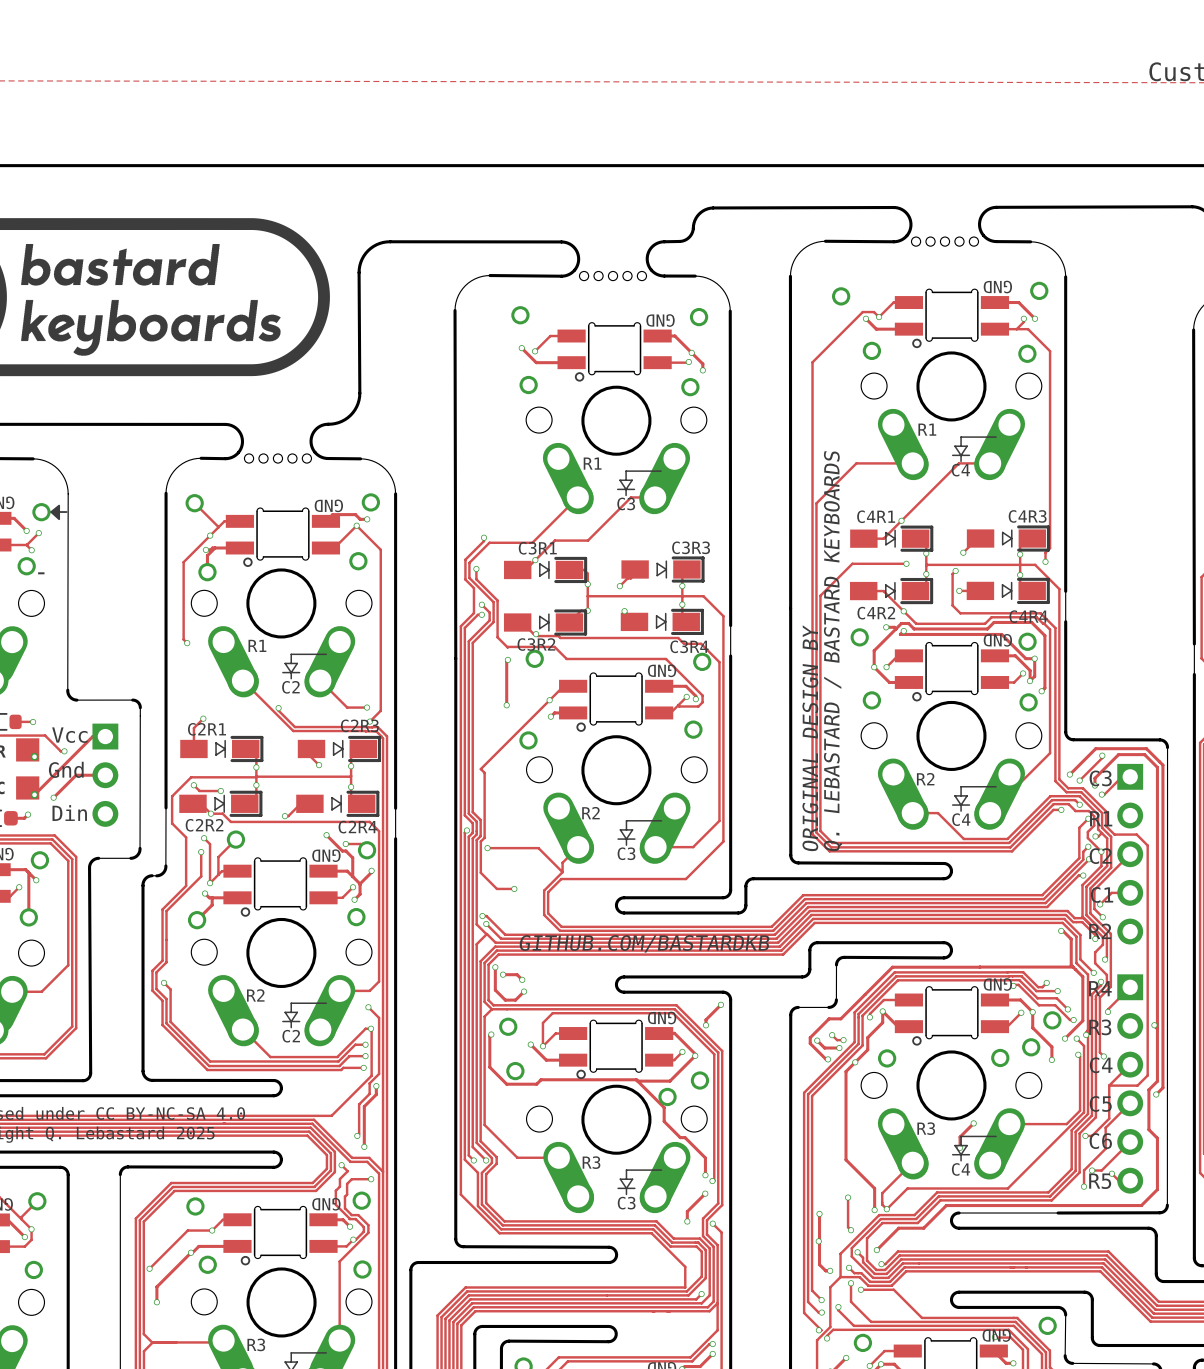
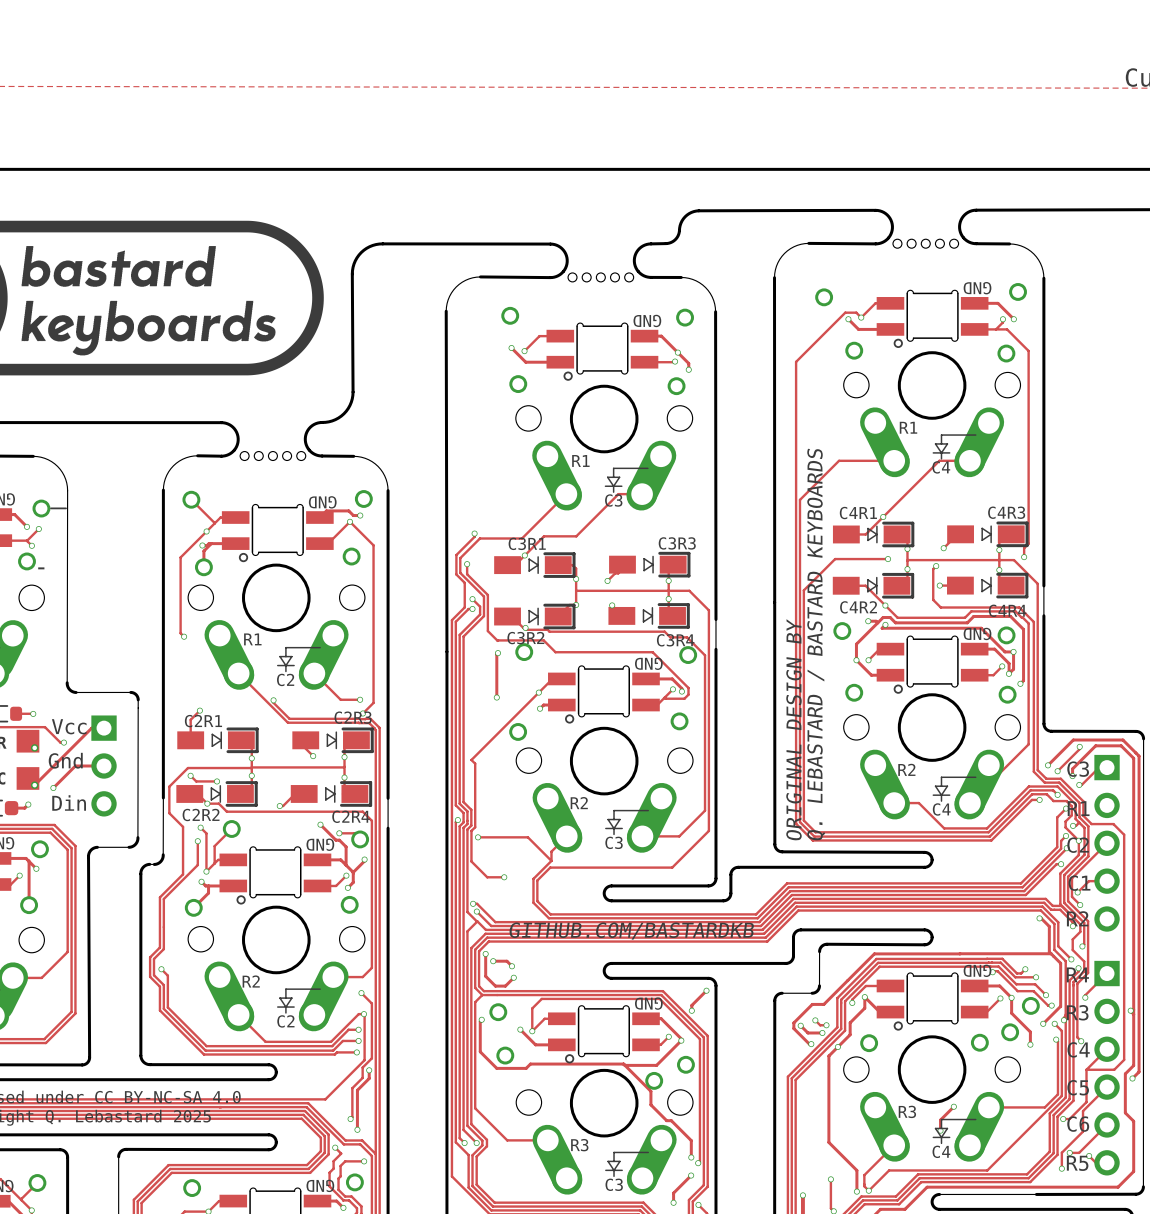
drawing: [50, 504, 61, 521] -> none

